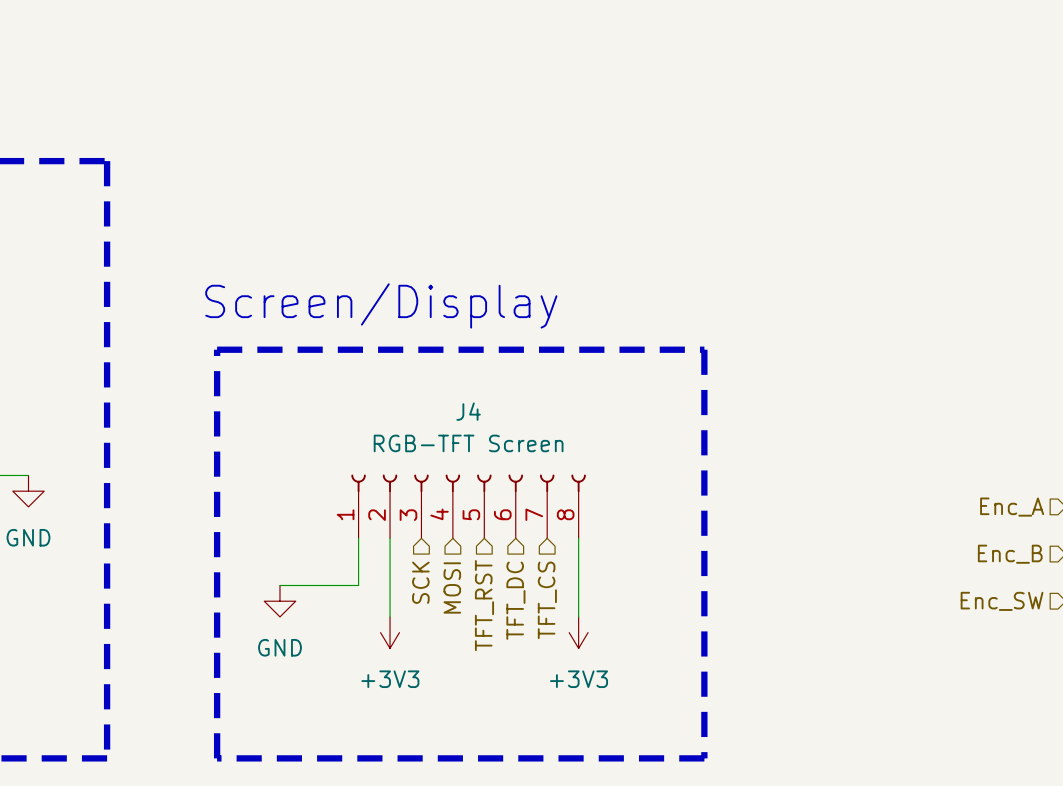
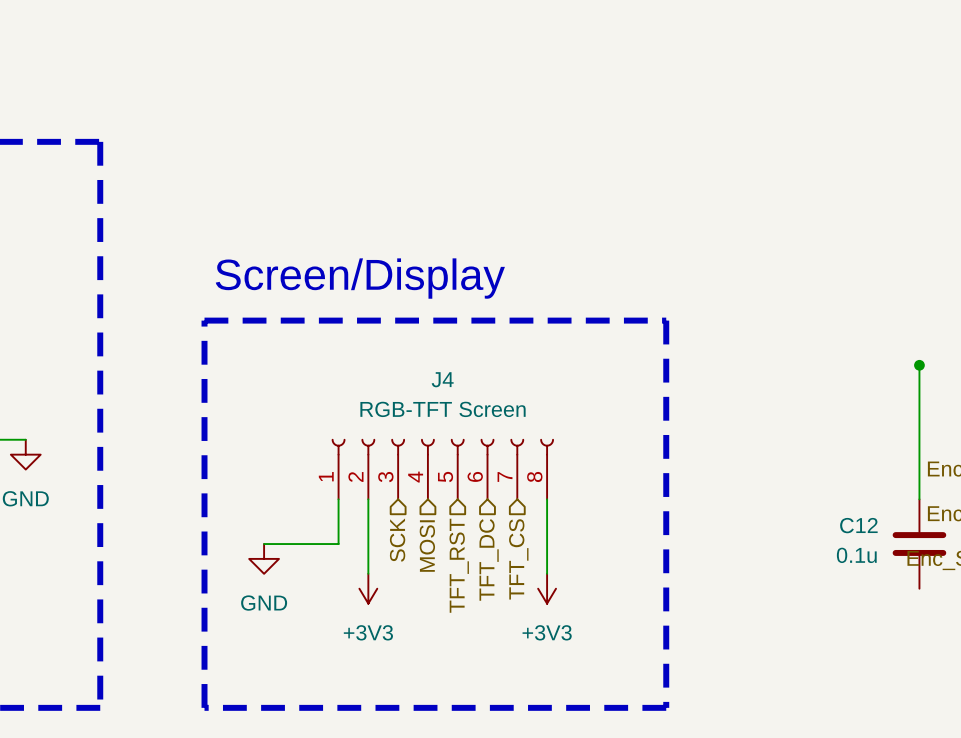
wire: none -> (919, 365) (919, 499)
junction: none -> (919, 365)
C12: none -> 0.1u (919, 544)

